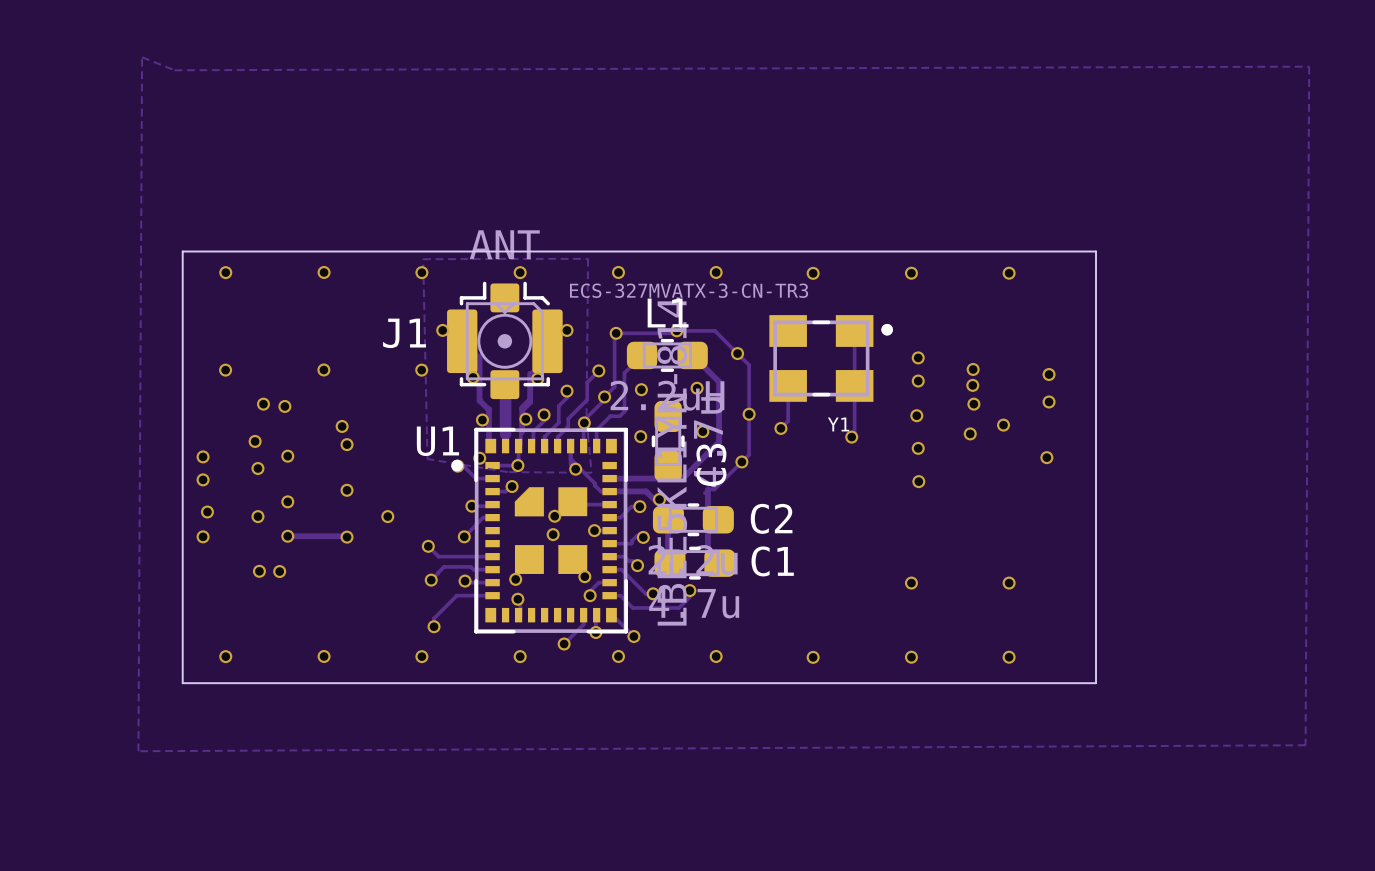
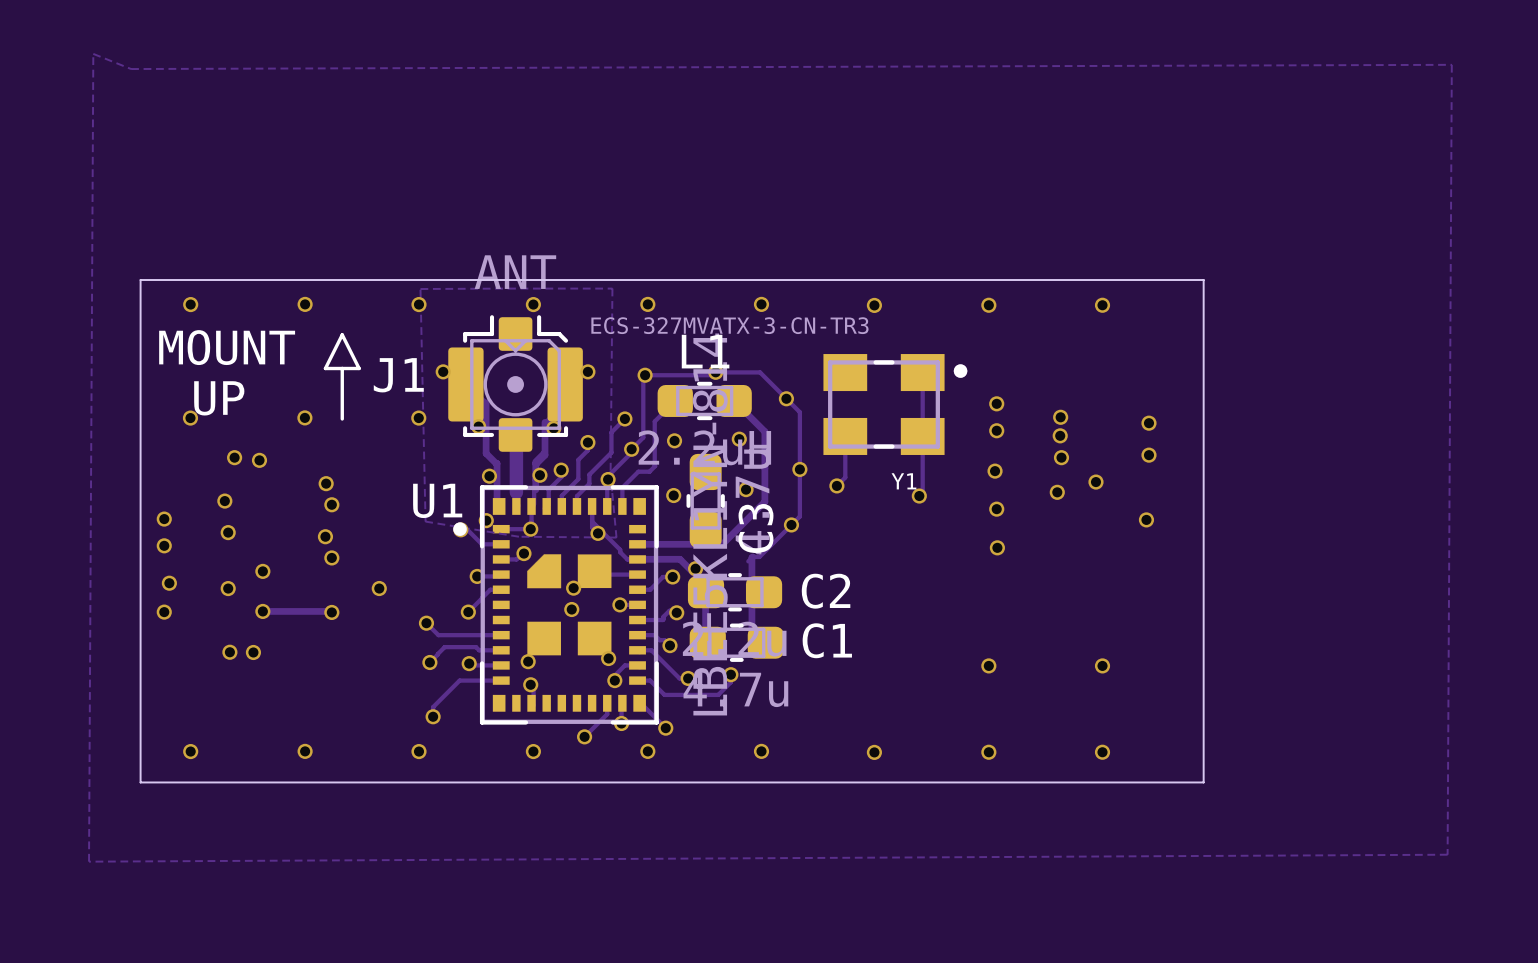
line: none -> (342, 334) (325, 368) (359, 368) (342, 334)
text: none -> MOUNT (227, 347)
line: none -> (342, 368) (342, 418)
text: none -> UP (219, 398)
via position: (287, 456) -> (325, 536)

